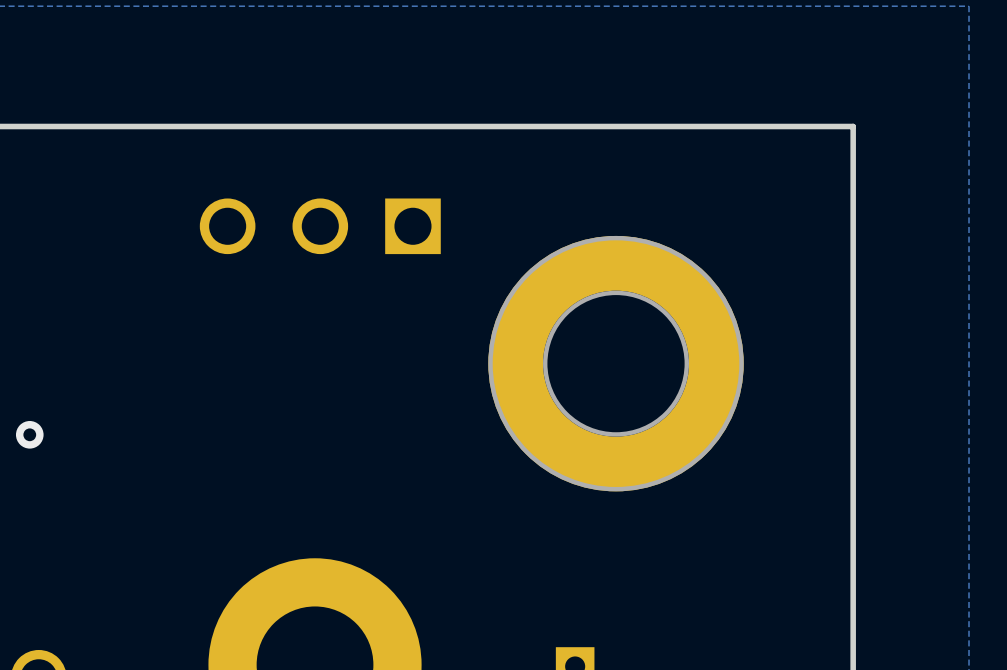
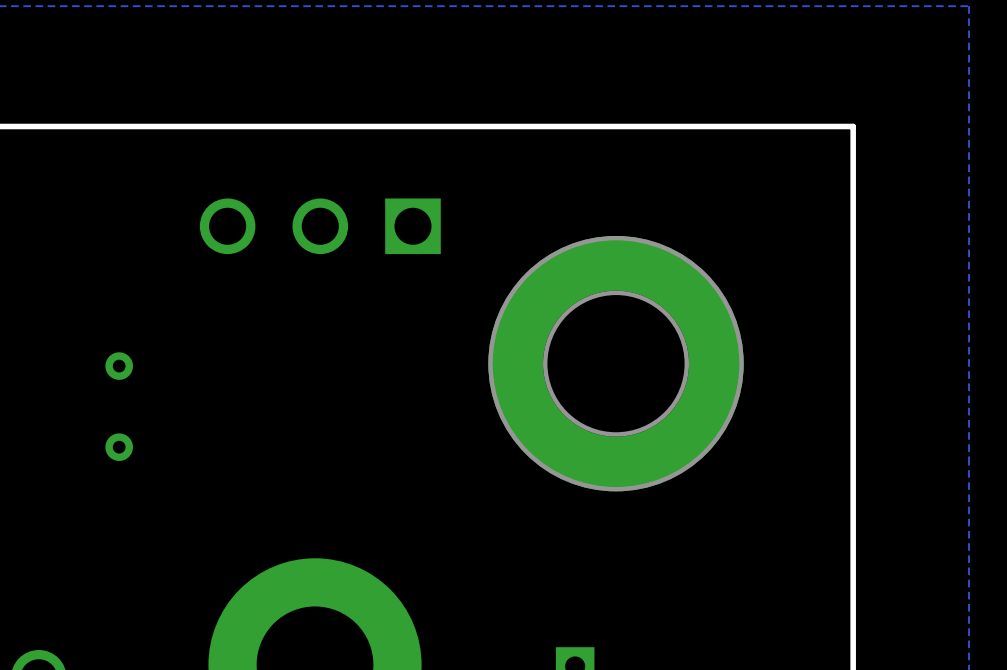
via: none -> (119, 366)
via: (29, 434) -> none
via: none -> (119, 447)

